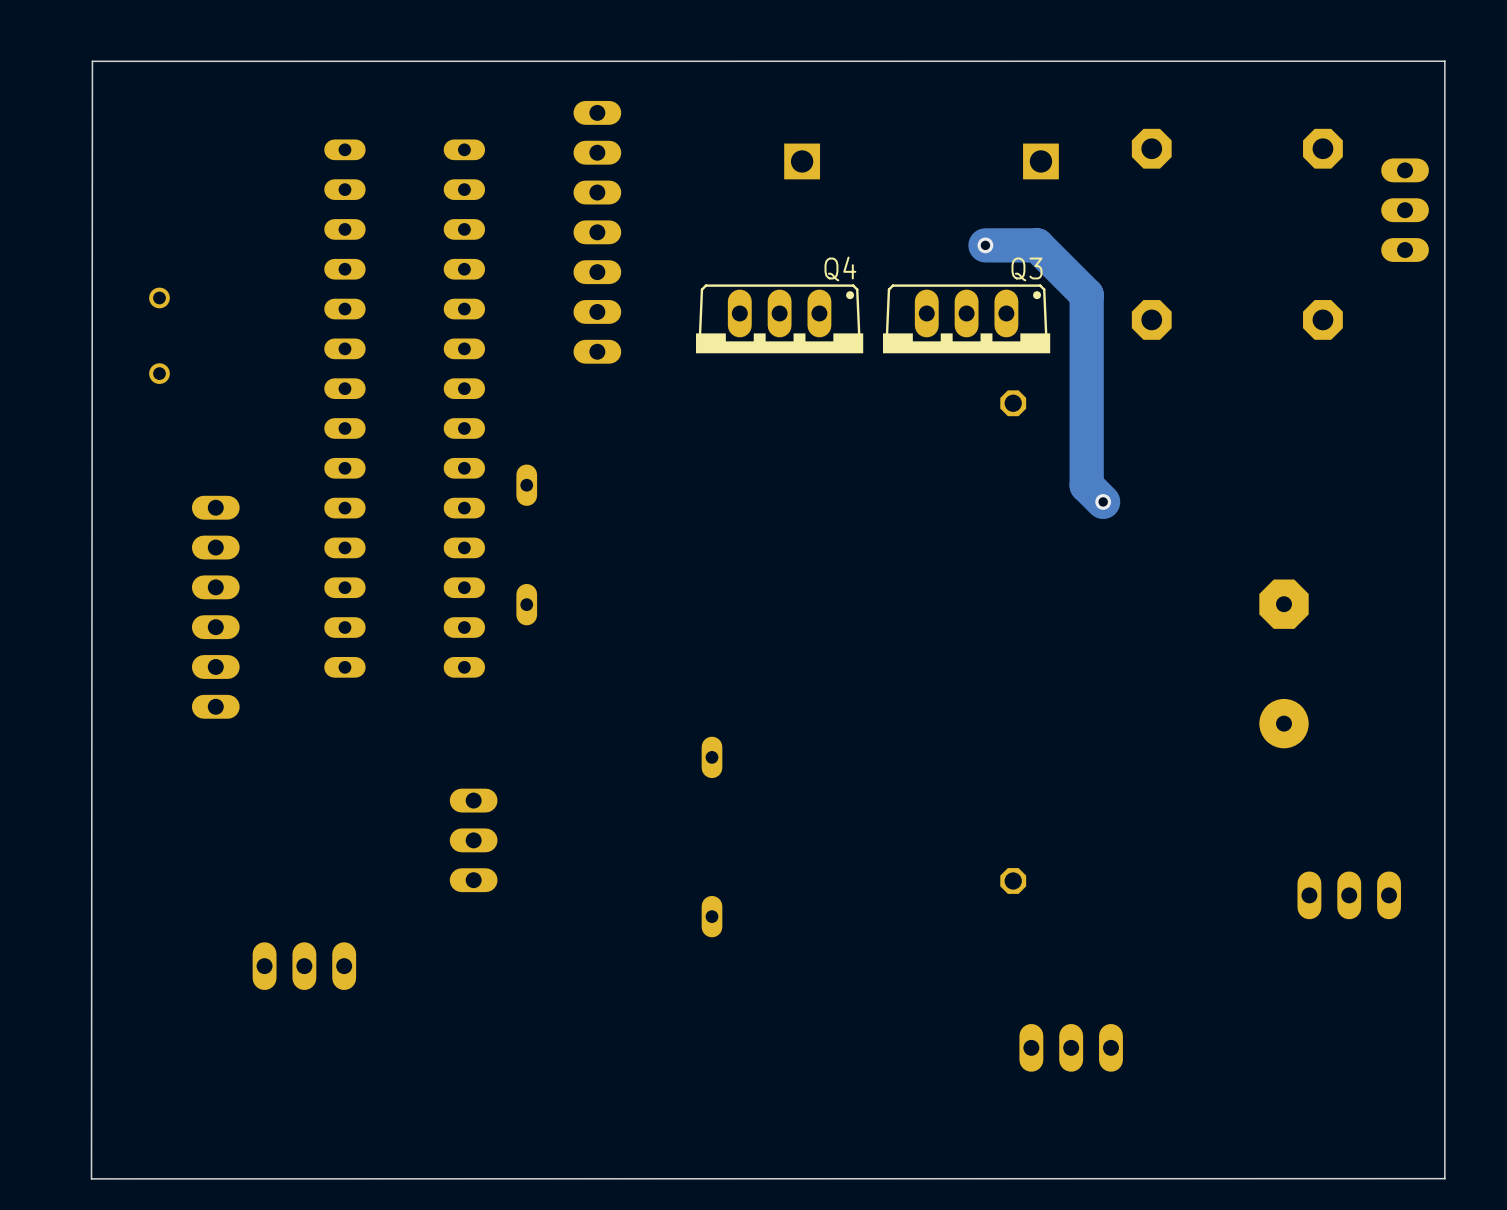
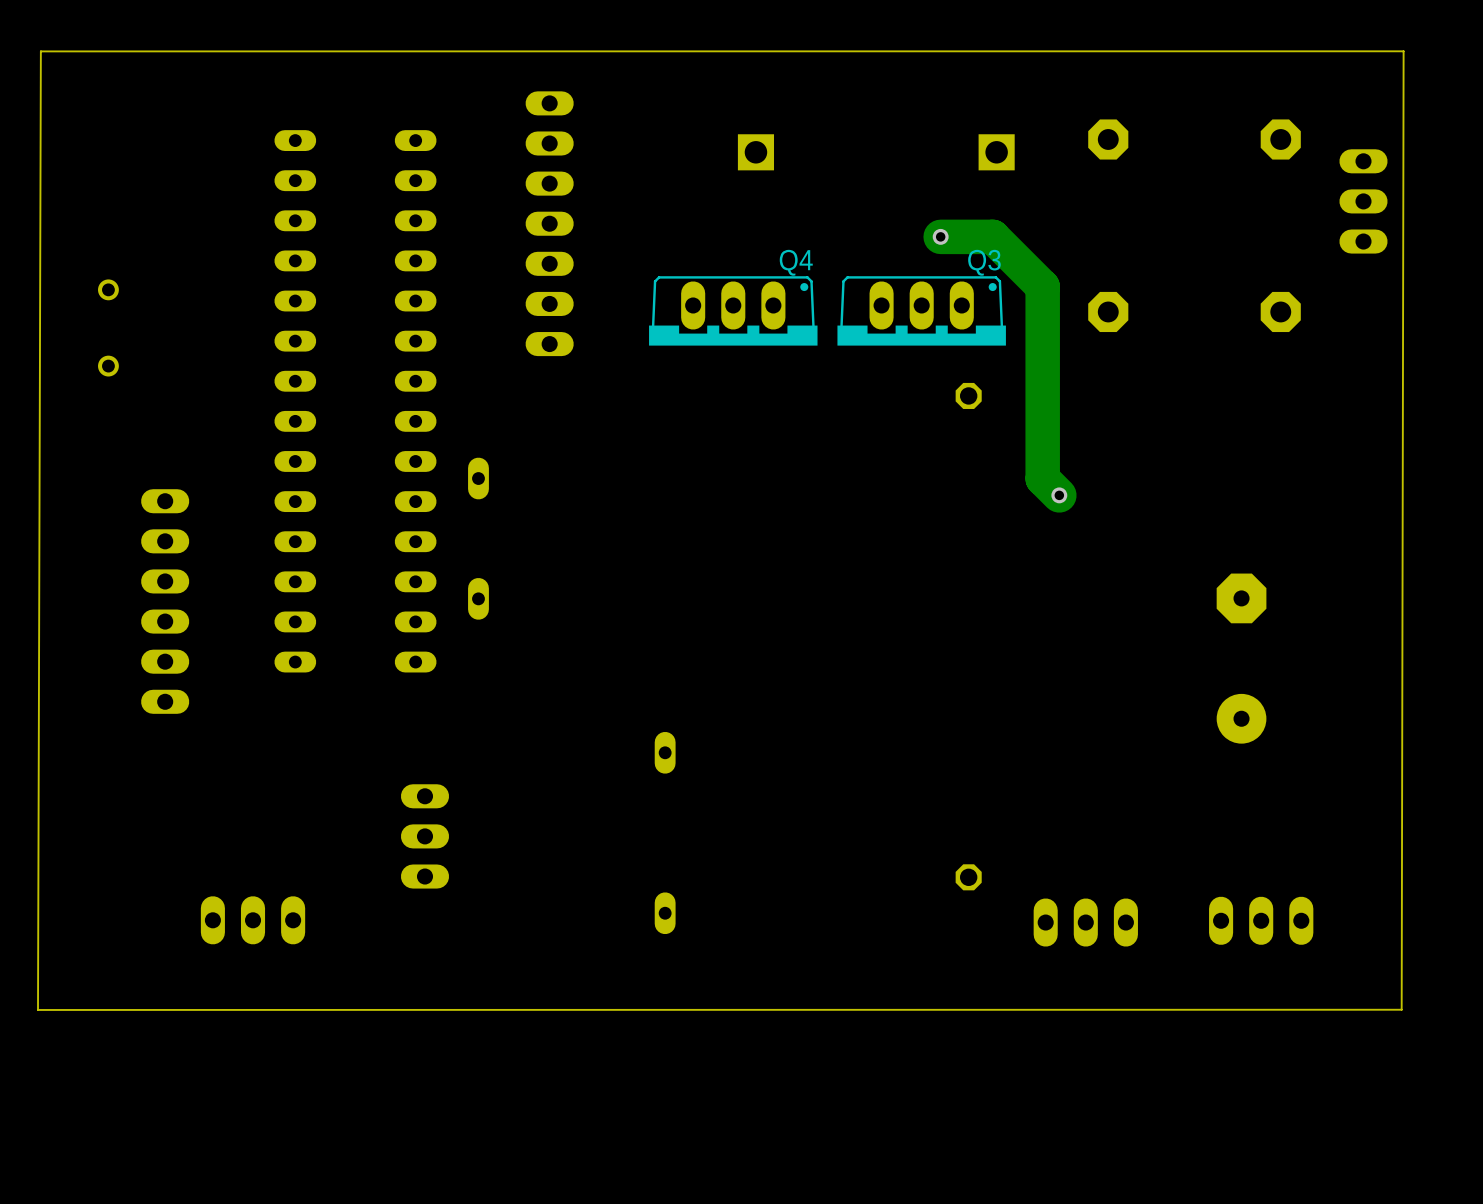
board edge: (1444, 61) (1444, 1178) (91, 1178) (92, 61) -> (1403, 51) (1401, 1009) (38, 1009) (40, 51)
part position: (1349, 895) -> (1261, 920)
part: none -> (1085, 922)
part position: (304, 966) -> (253, 920)
part: (1071, 1047) -> none

